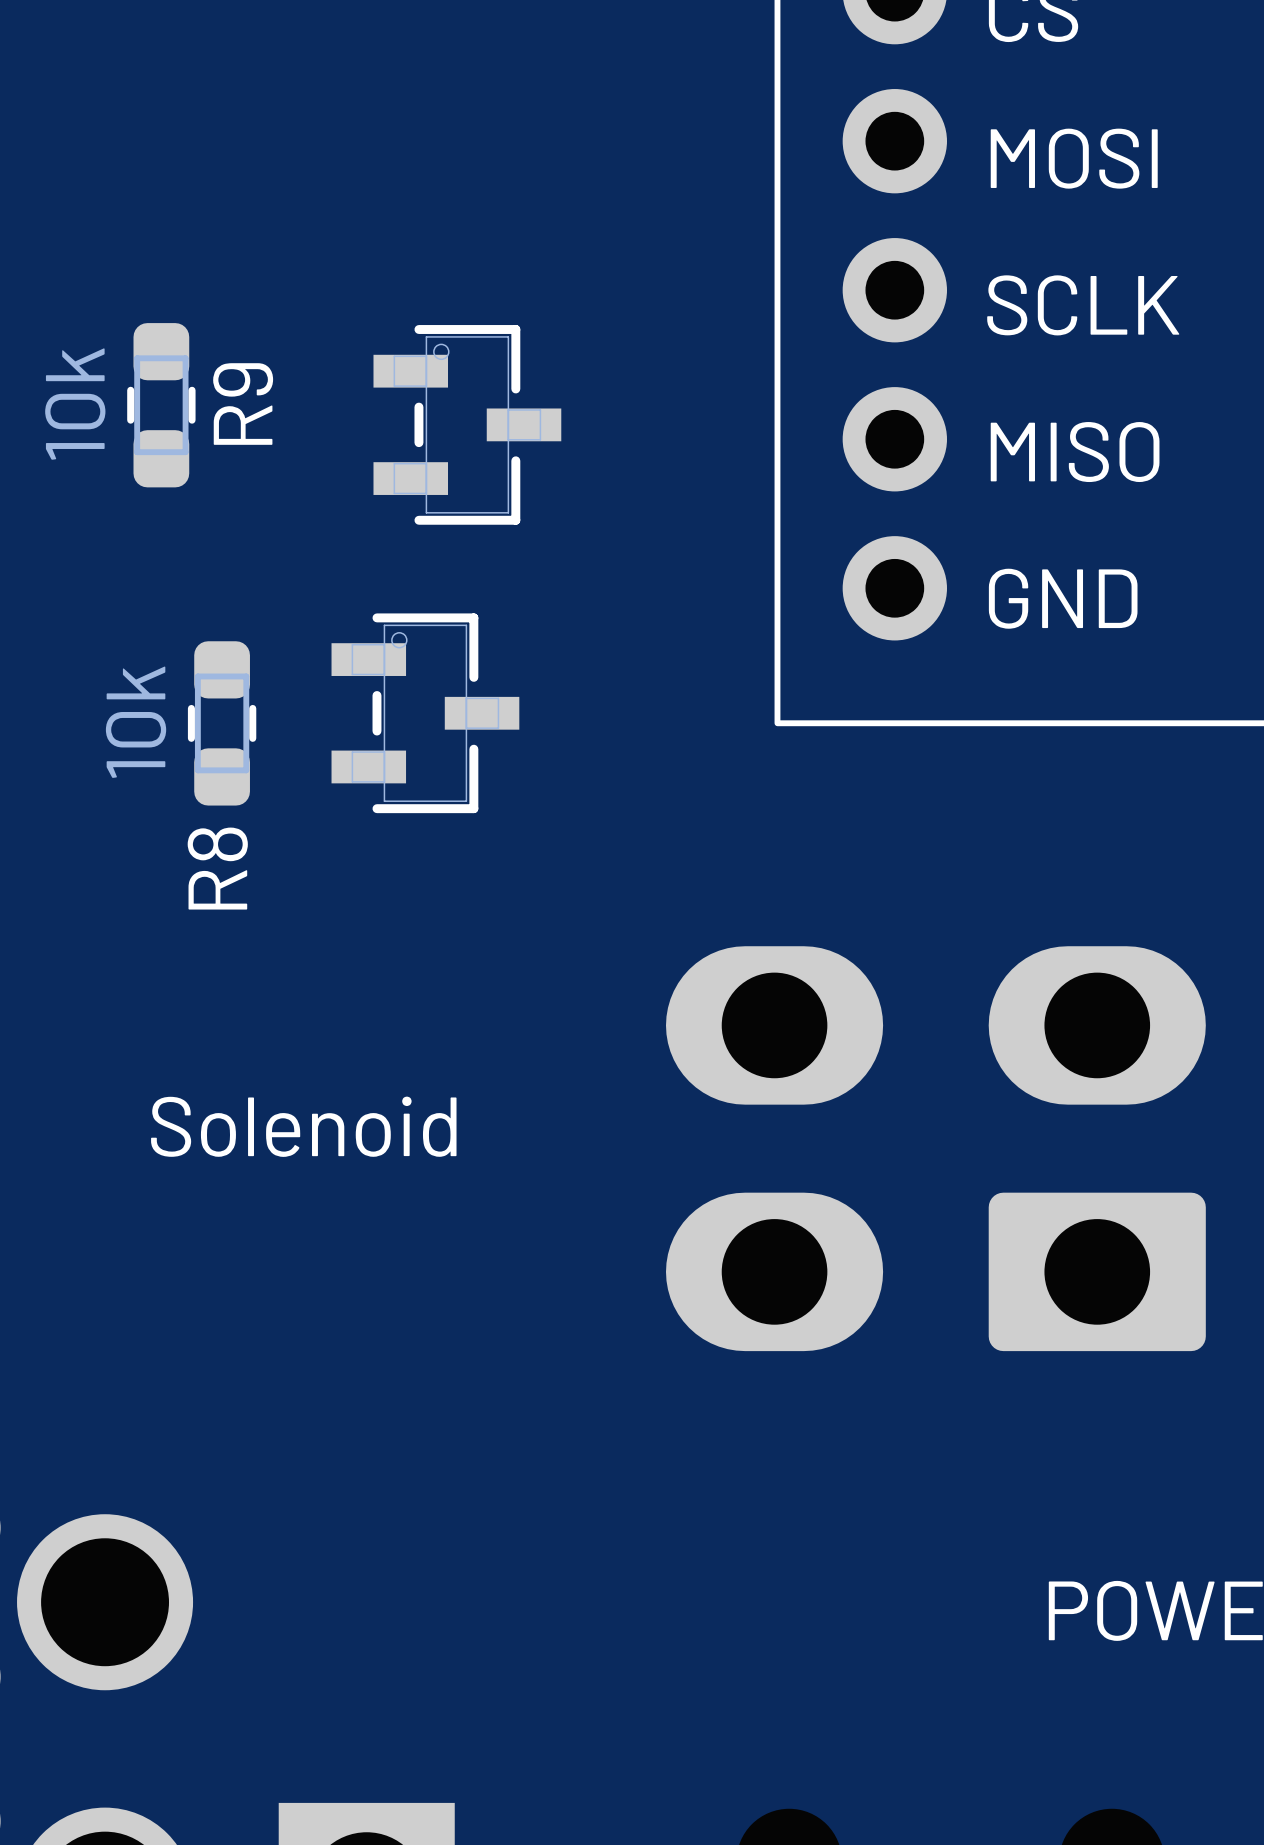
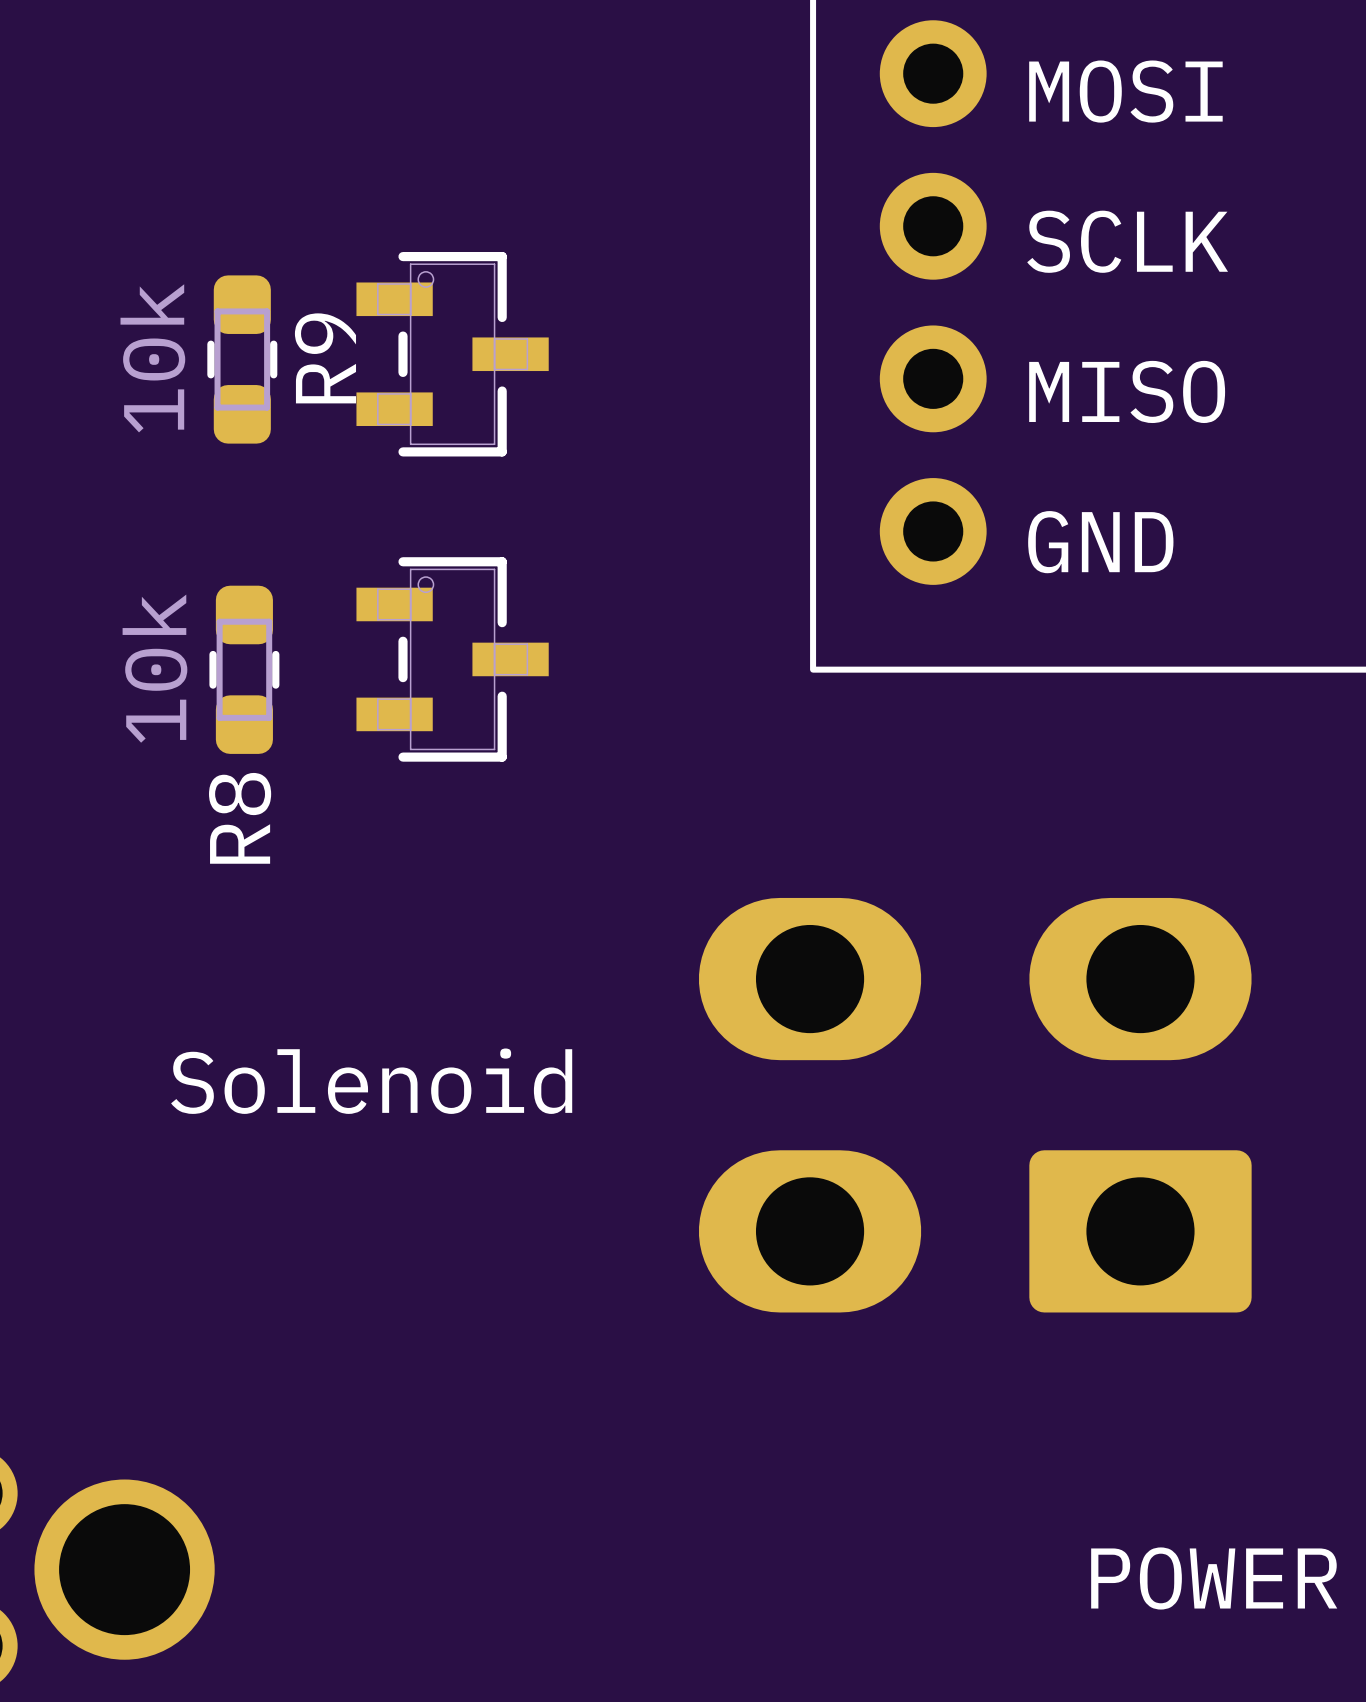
R9 position: (161, 405) -> (242, 359)
part position: (467, 424) -> (452, 354)

